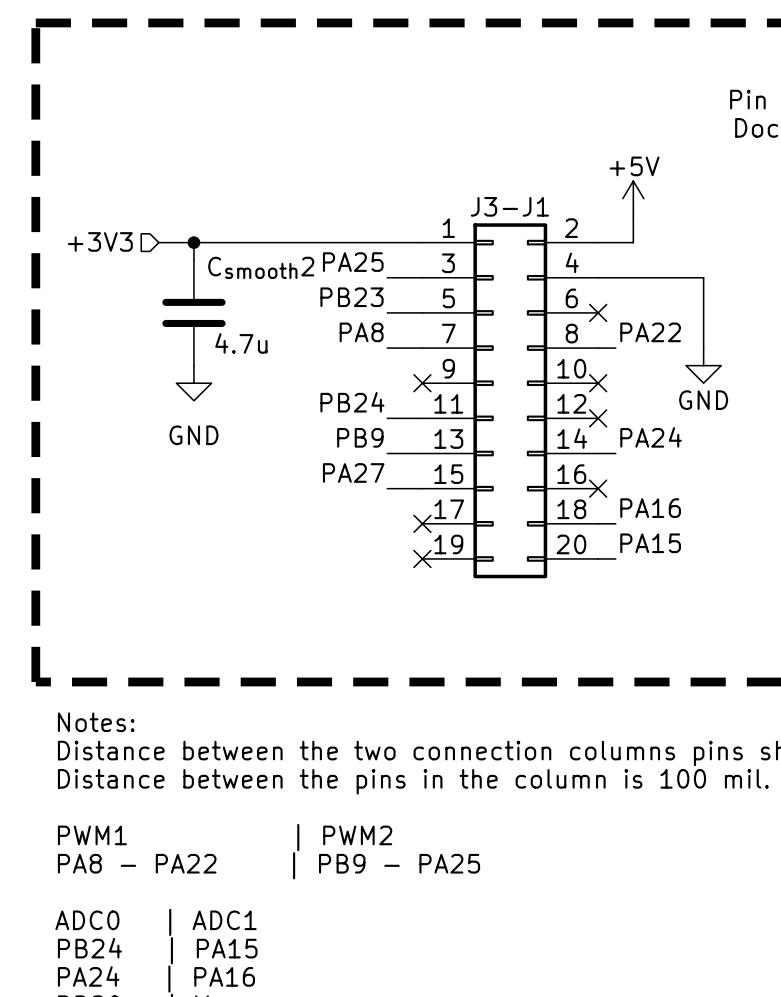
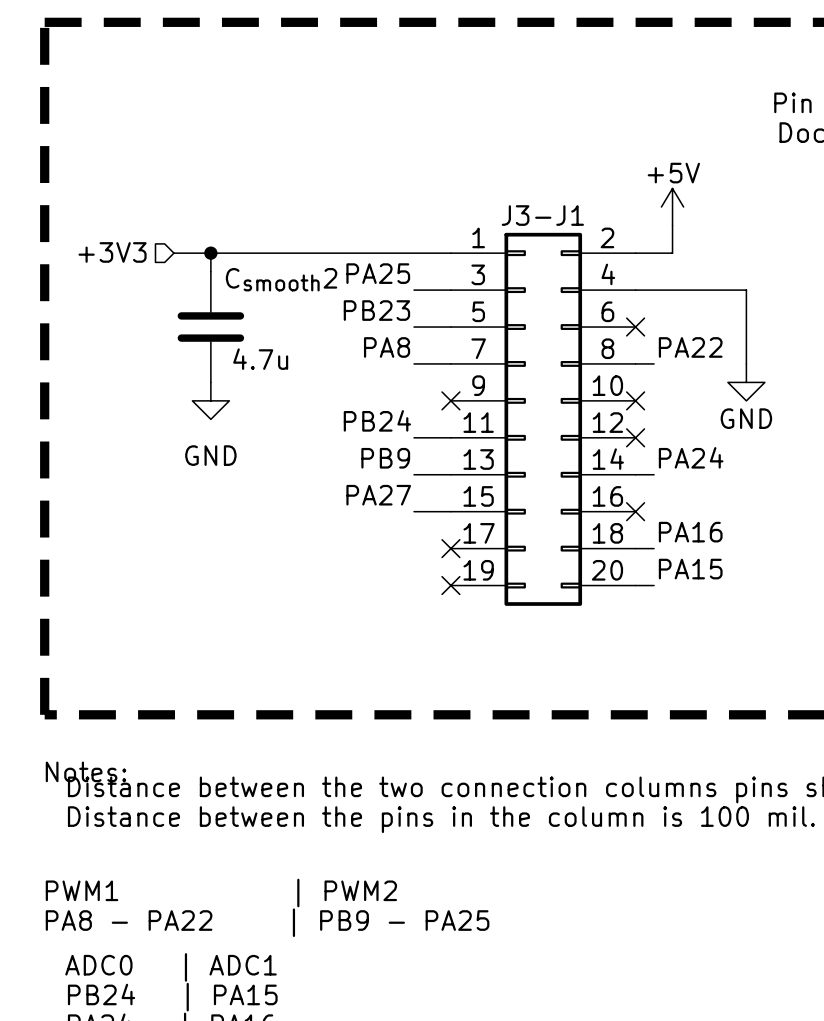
text position: Notes: (96, 722) -> Notes: (85, 771)
text position: PWM1 | PWM2 (225, 837) -> PWM1 | PWM2 (221, 892)
text position: PA8 - PA22 | PB9 - PA25 (269, 865) -> PA8 - PA22 | PB9 - PA25 (267, 922)

